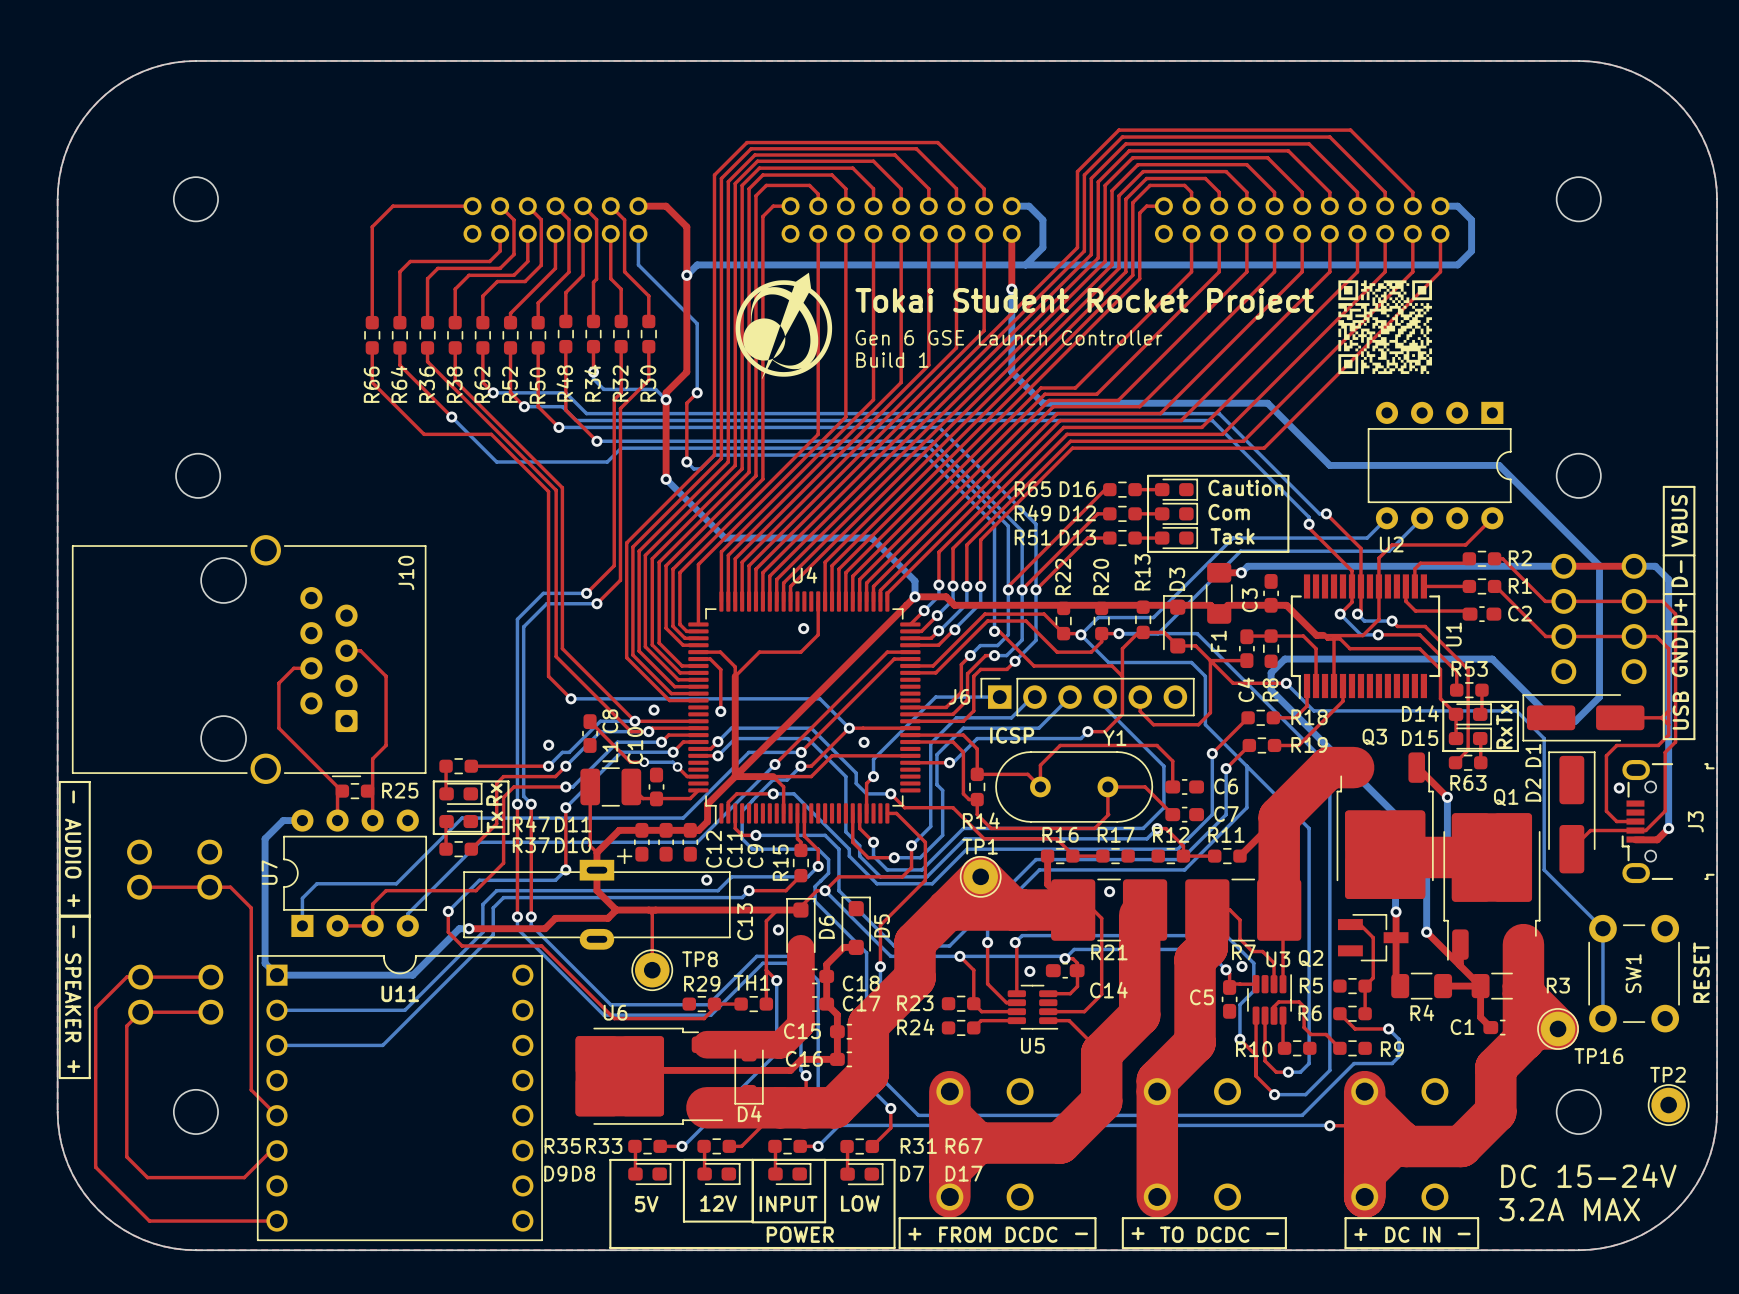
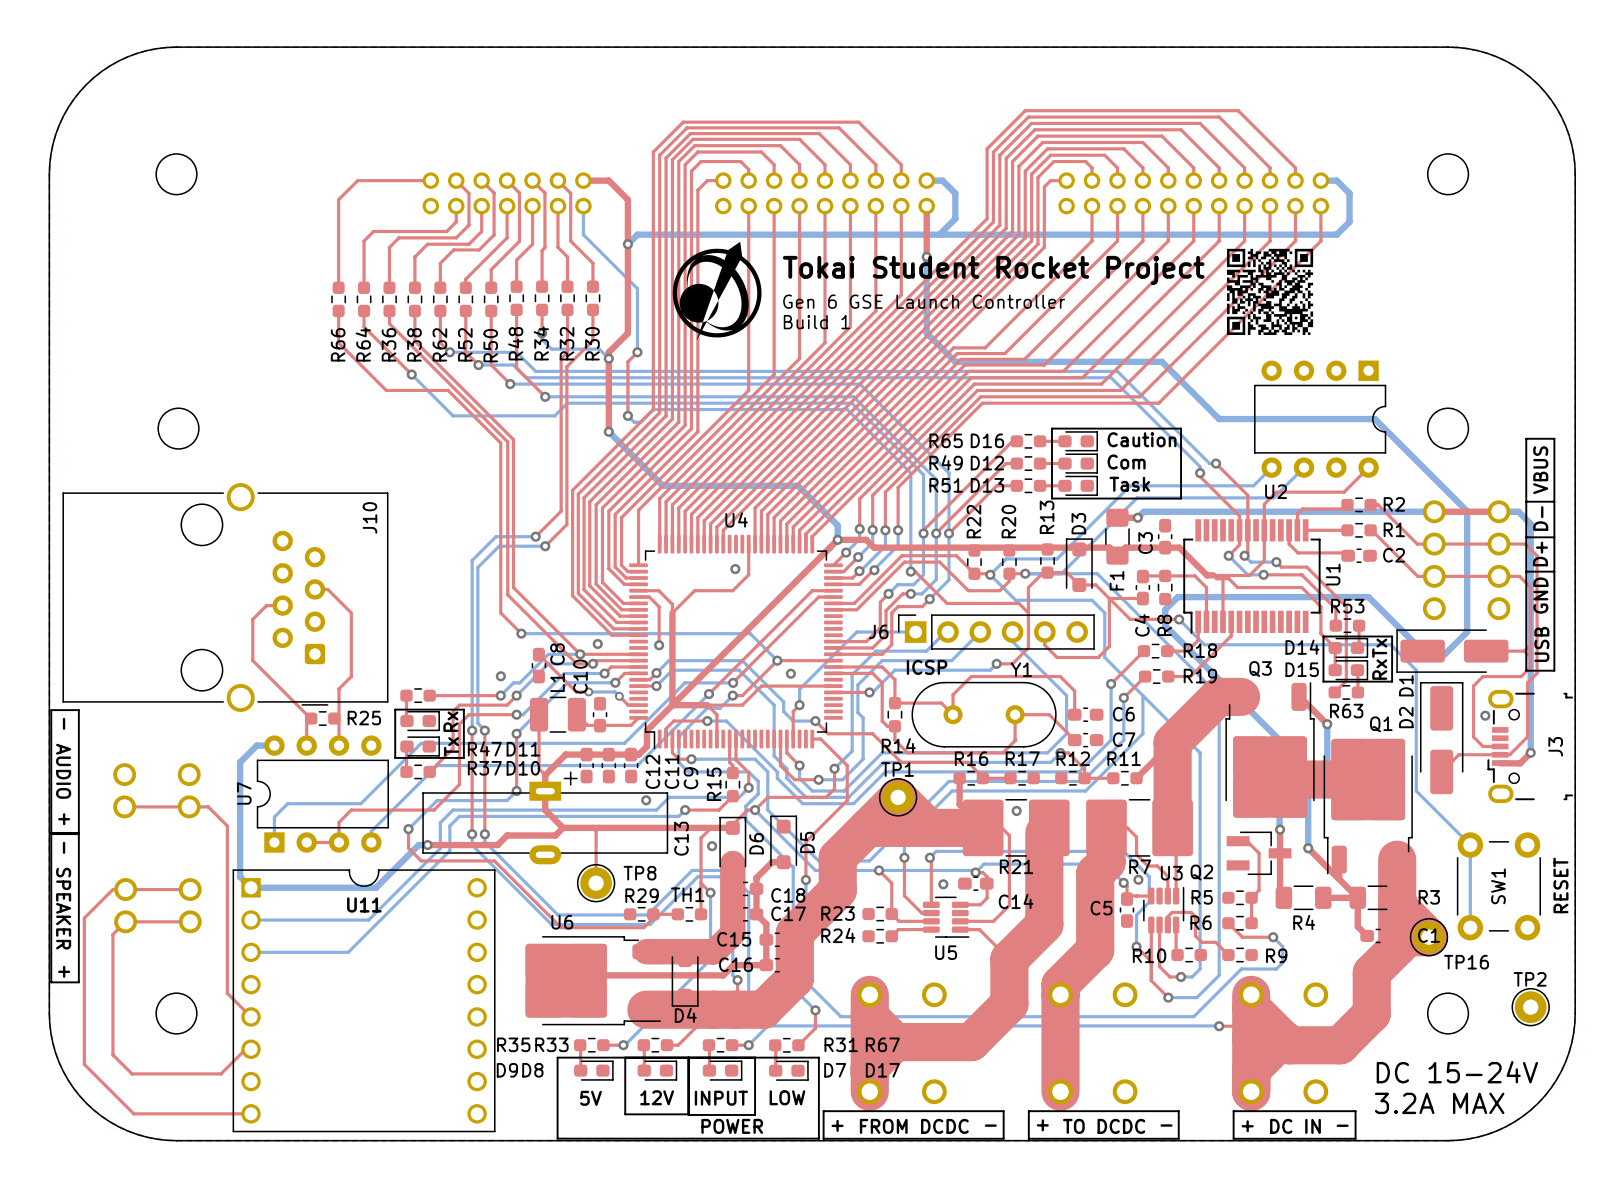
C1 name position: C1 (1462, 1027) -> C1 (1428, 935)

